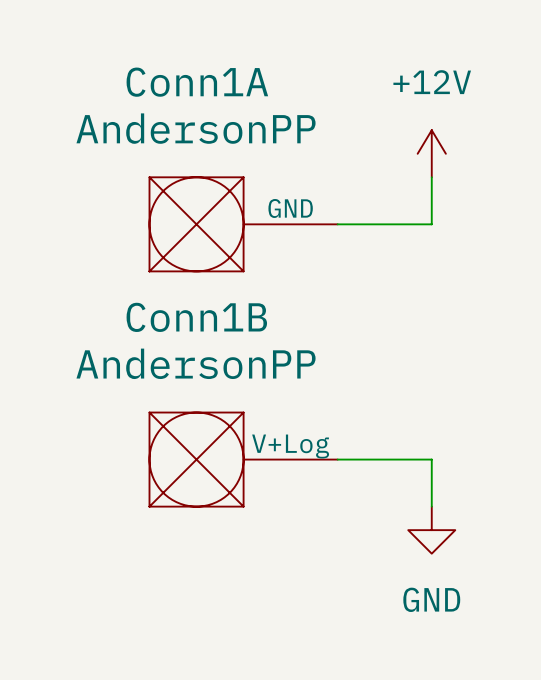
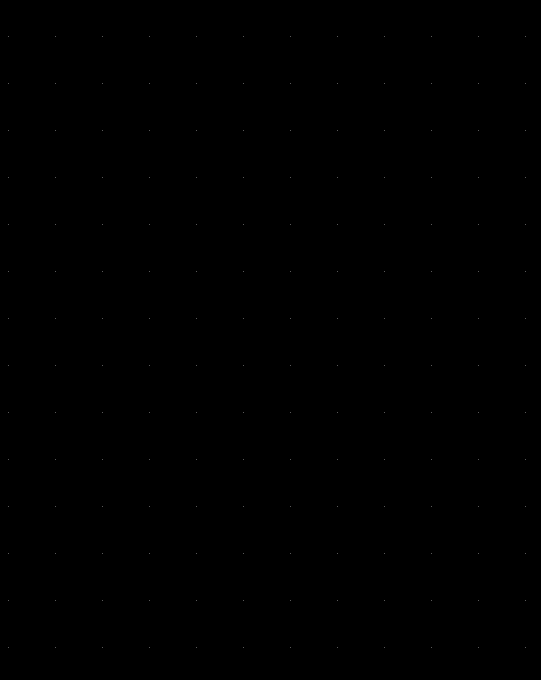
power symbol: +12V (431, 153) -> none
wire: (431, 177) (431, 224) (337, 224) -> none
Conn1A: AndersonPP (243, 224) -> none
Conn1B: AndersonPP (243, 459) -> none
wire: (337, 459) (431, 459) (431, 506) -> none
power symbol: GND (431, 530) -> none

